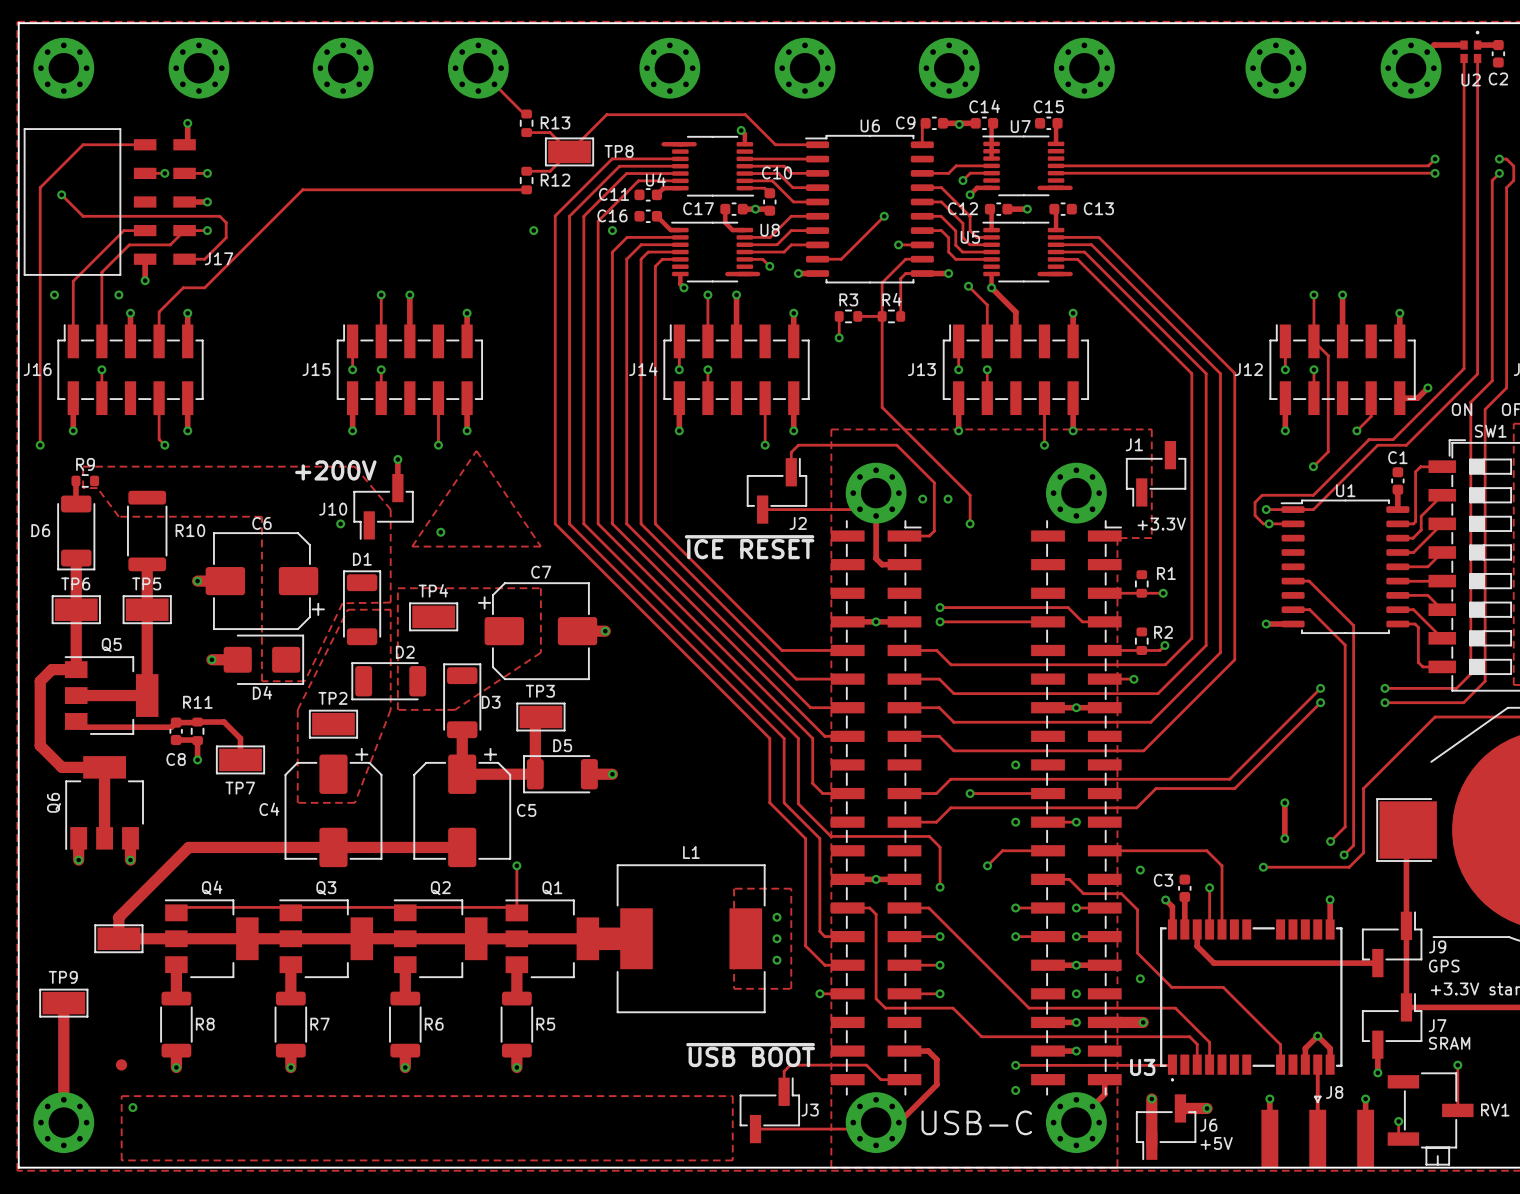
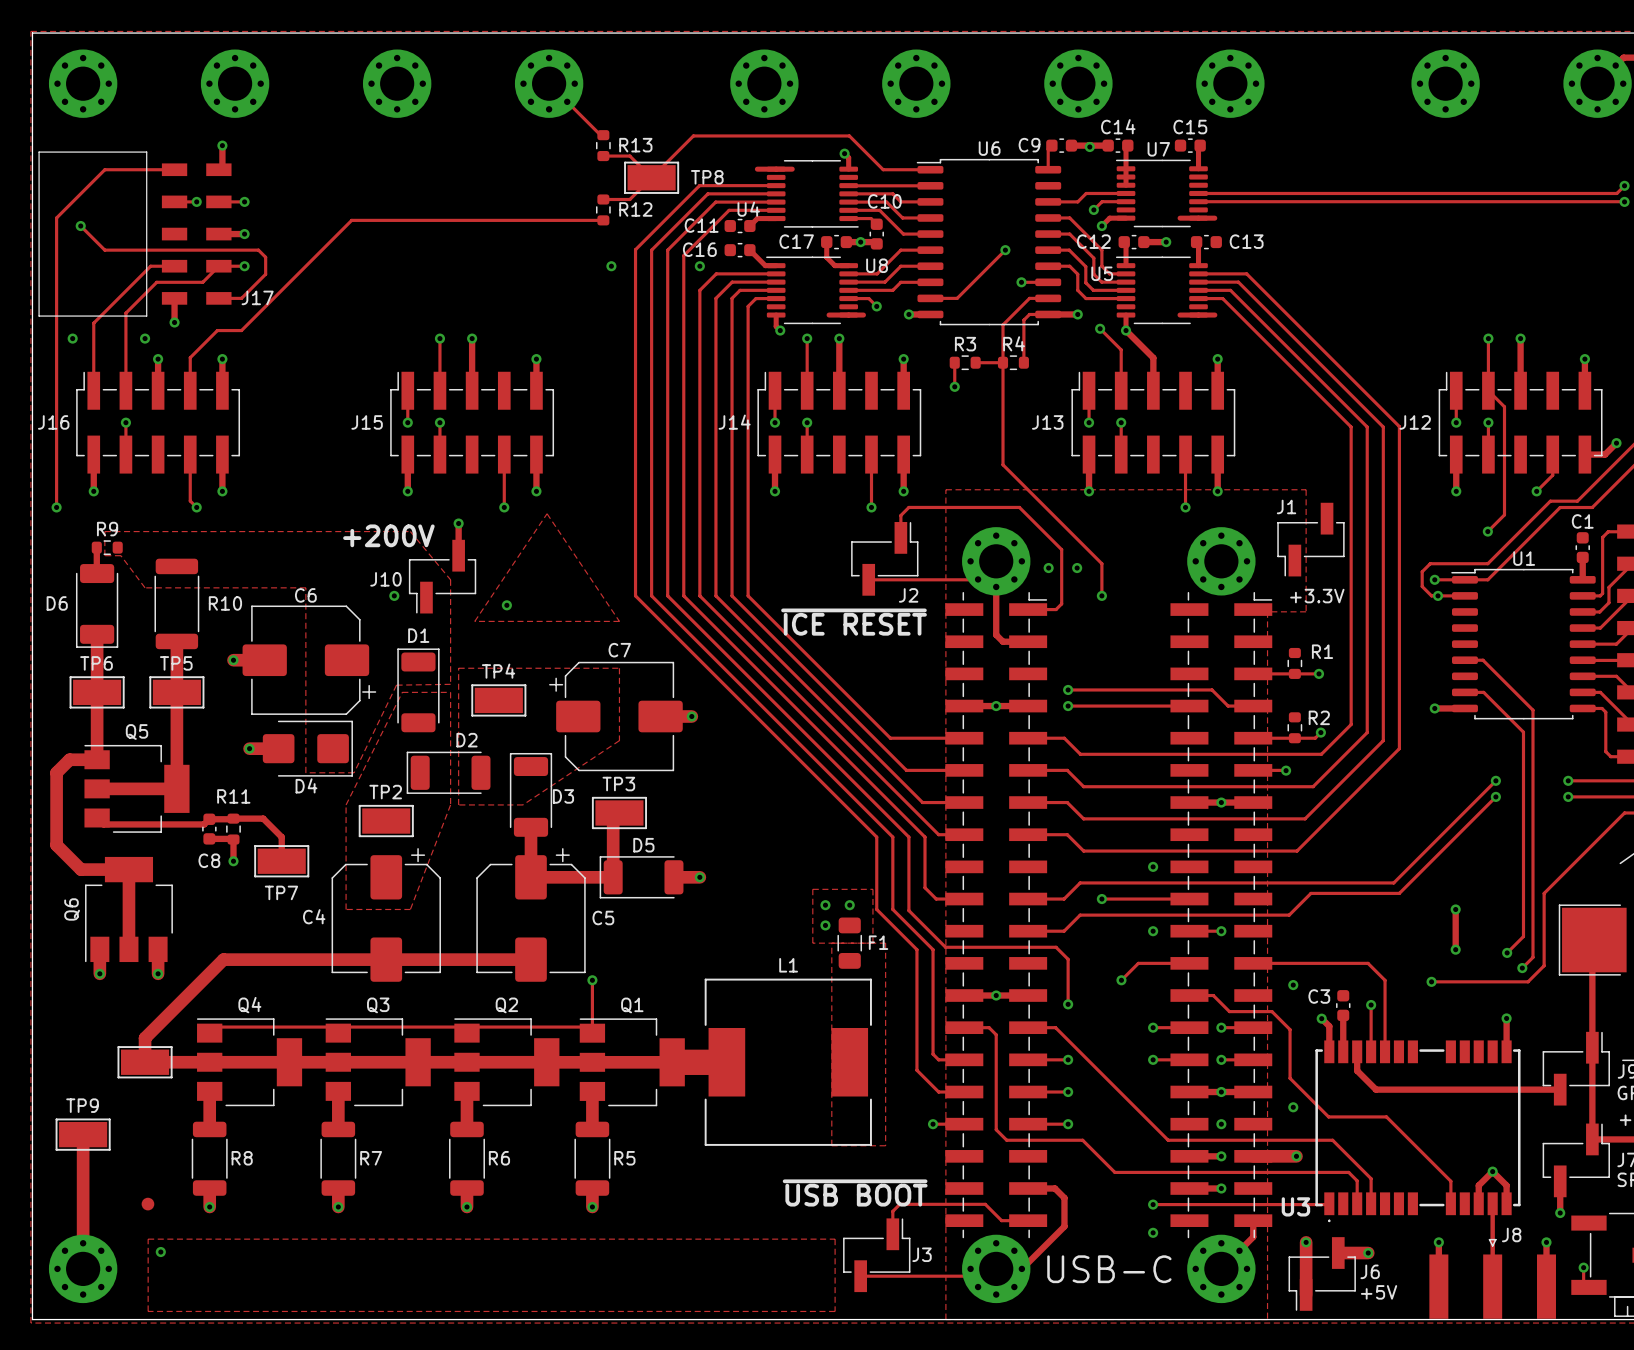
via: none -> (825, 905)
via: none -> (849, 905)
via: none -> (825, 925)
zone outline: none -> (831, 943) (831, 1145) (885, 1145) (885, 943) (812, 943) (812, 889) (872, 889) (872, 943)
F1: none -> (849, 943)
zone outline: (734, 888) (734, 988) (791, 988) (791, 888) (734, 888) -> none
via: (776, 917) -> none
via: (776, 938) -> none
via: (776, 960) -> none

